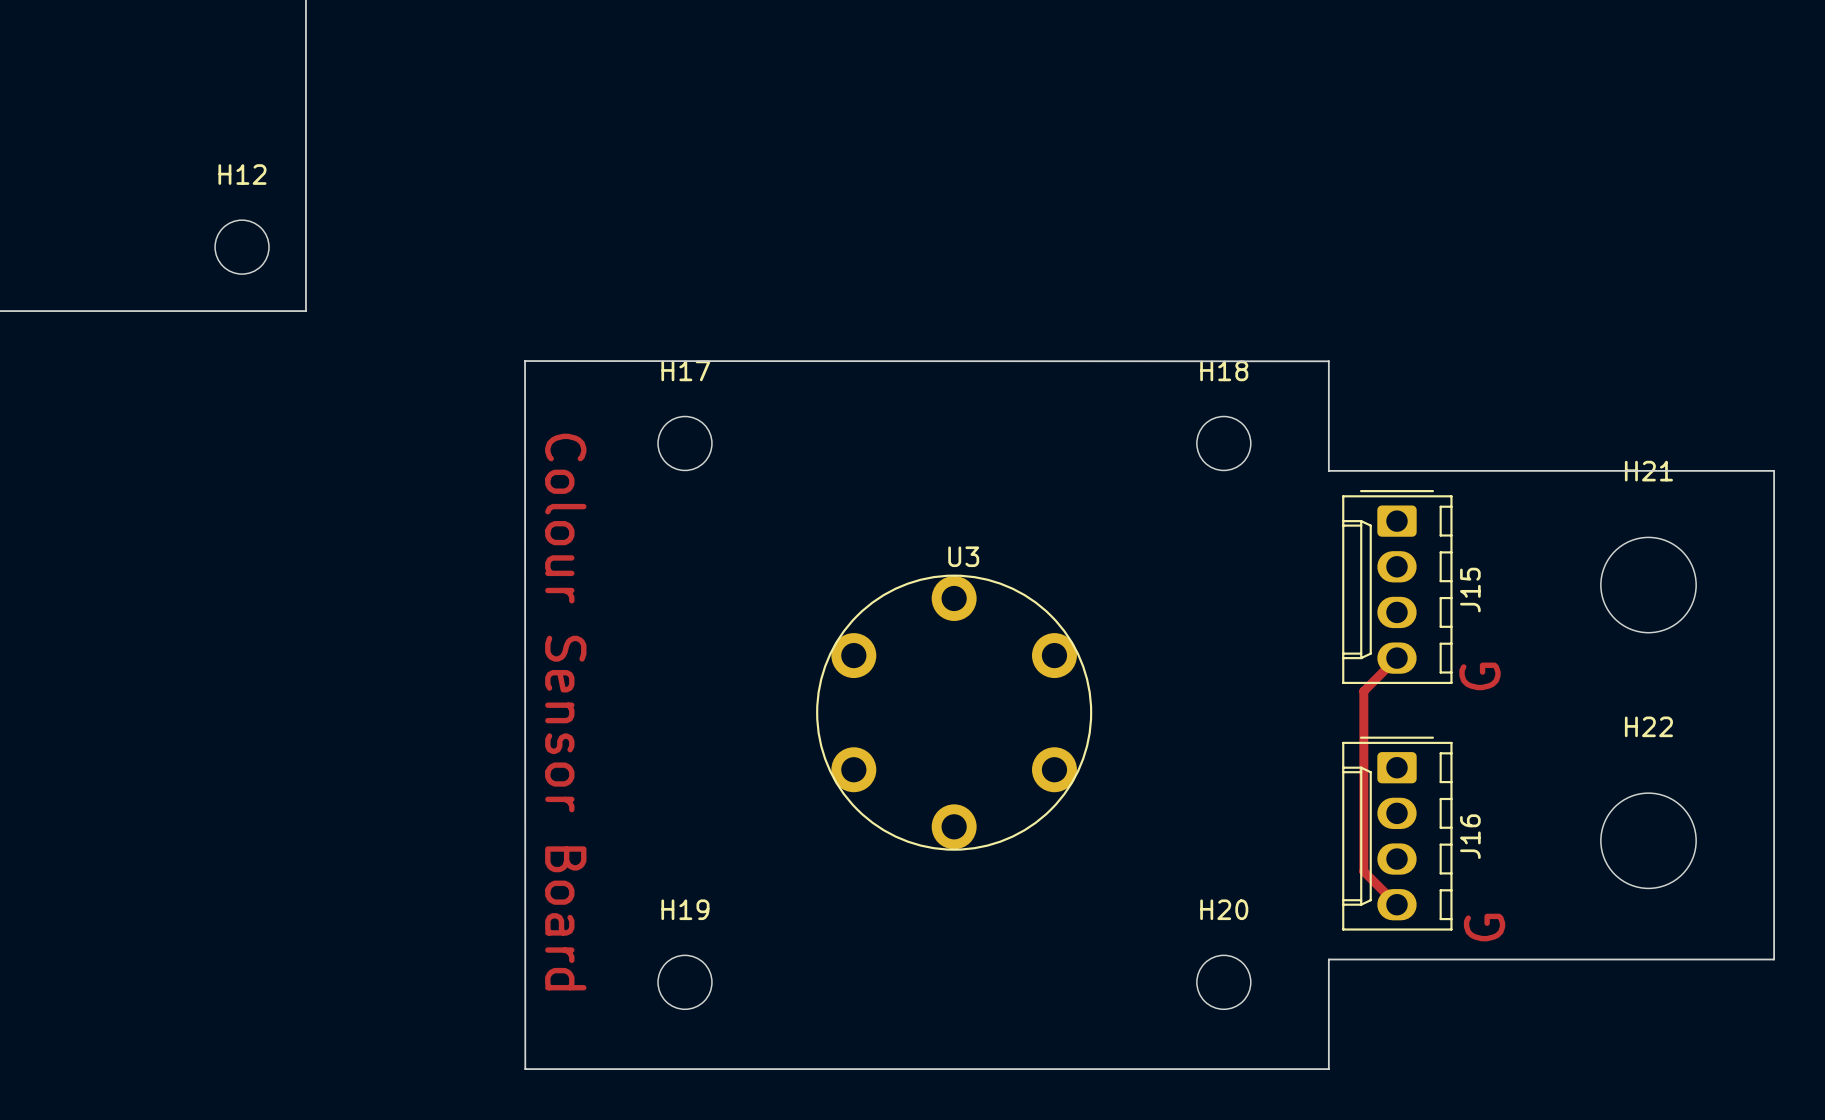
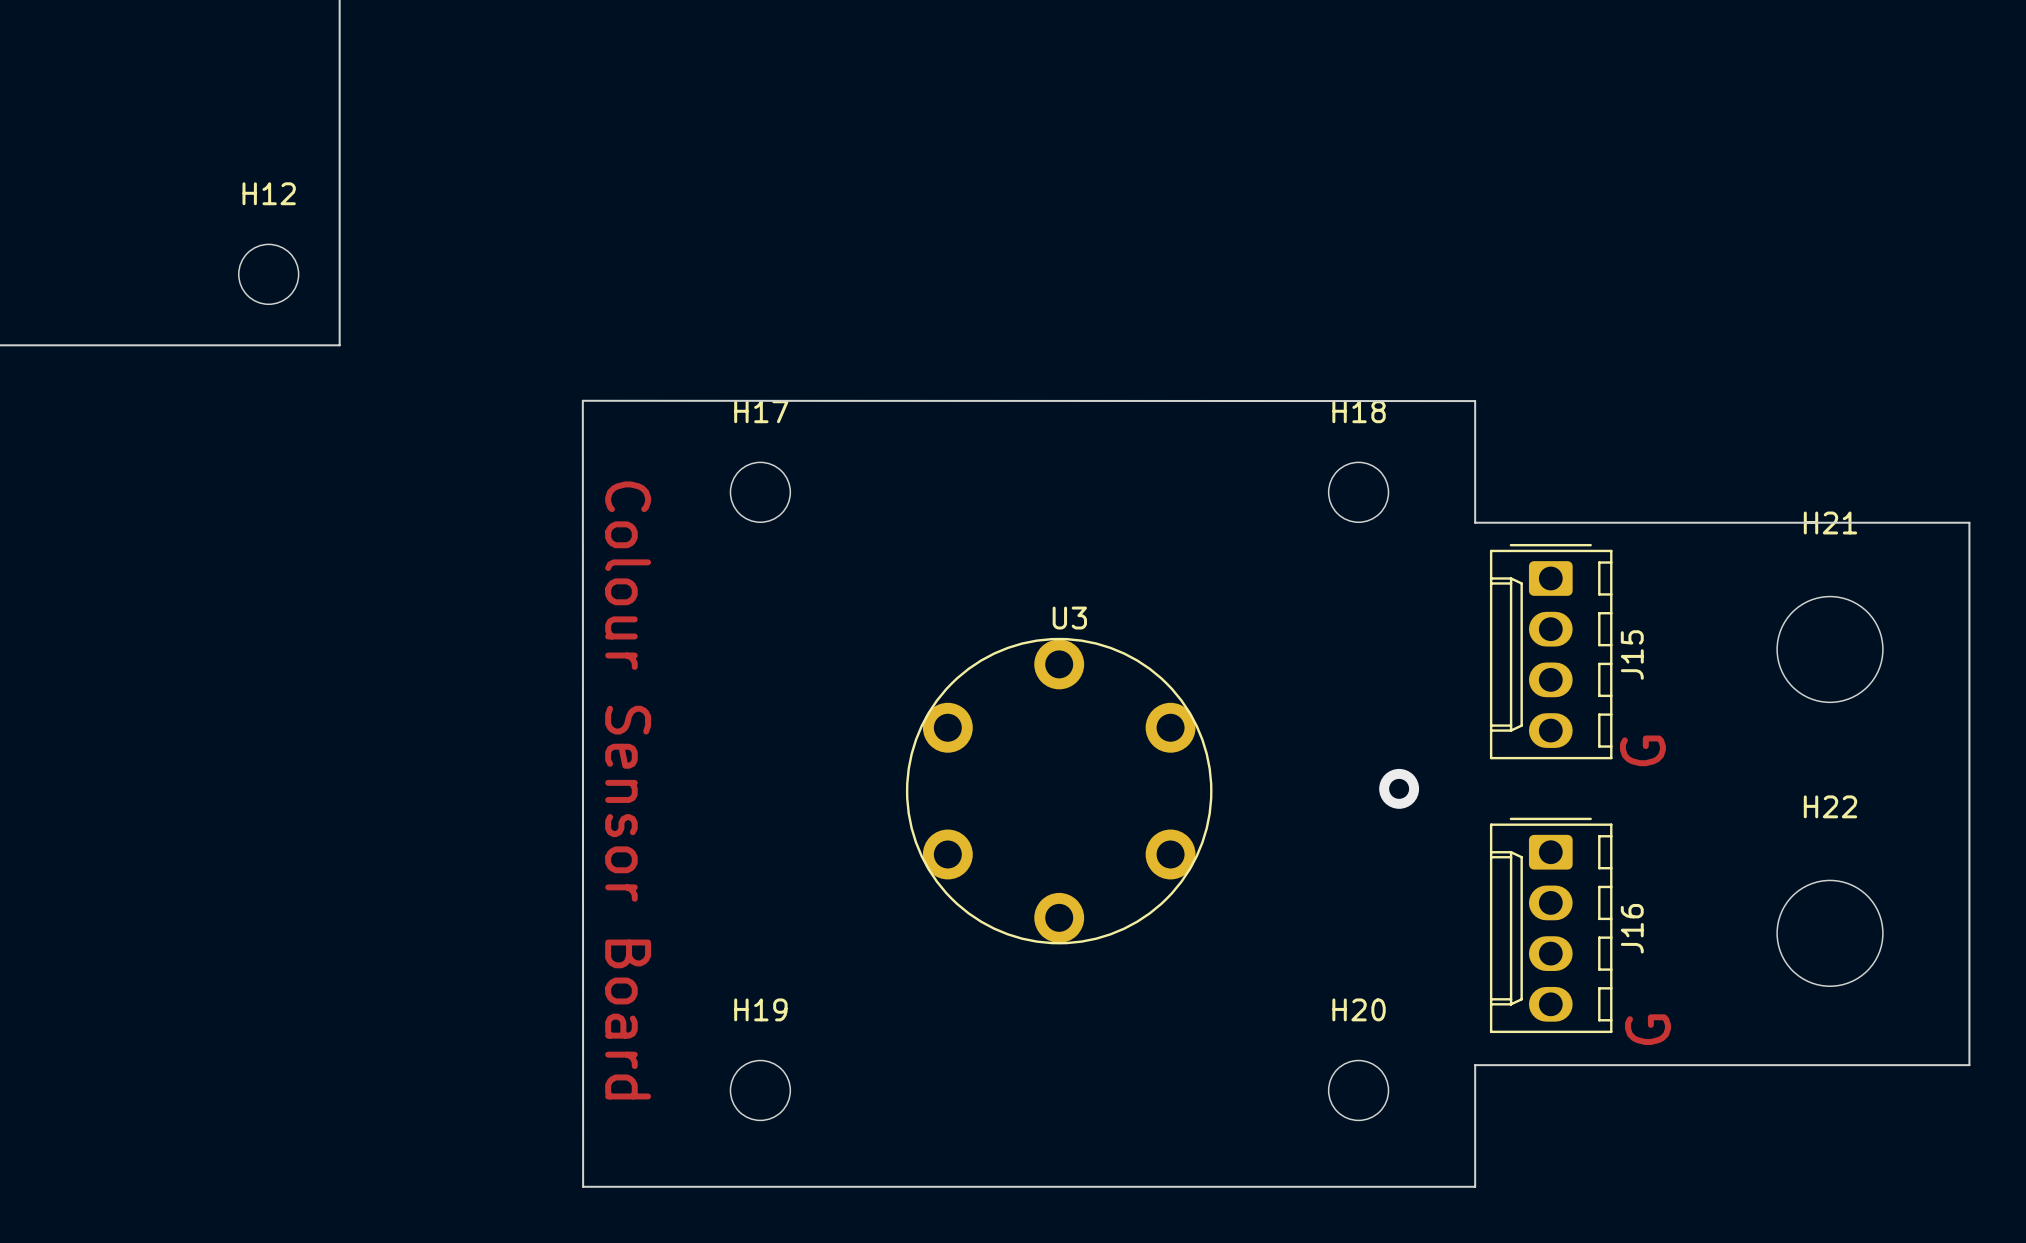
track: (1396, 658) (1363, 691) (1363, 871) (1396, 904) -> none
via: none -> (1399, 788)

